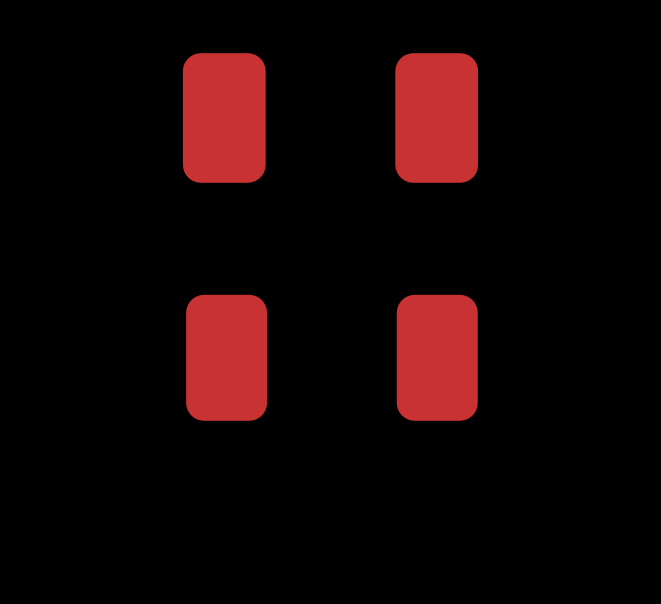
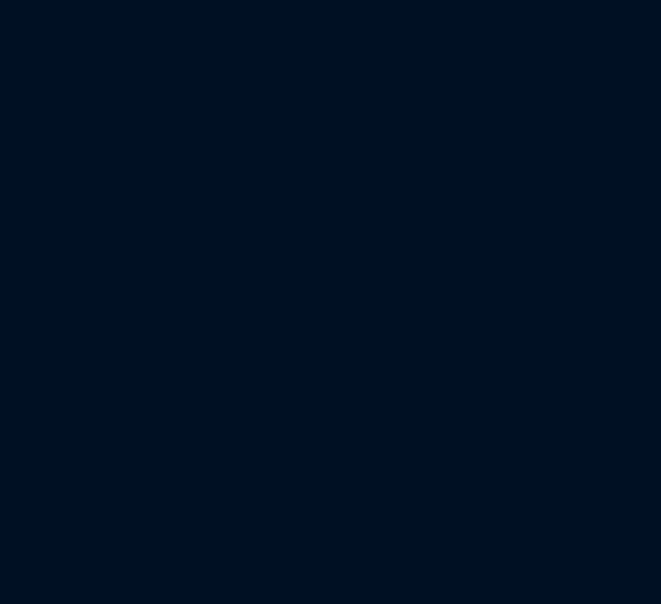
part: (330, 117) -> none
part: (331, 357) -> none

